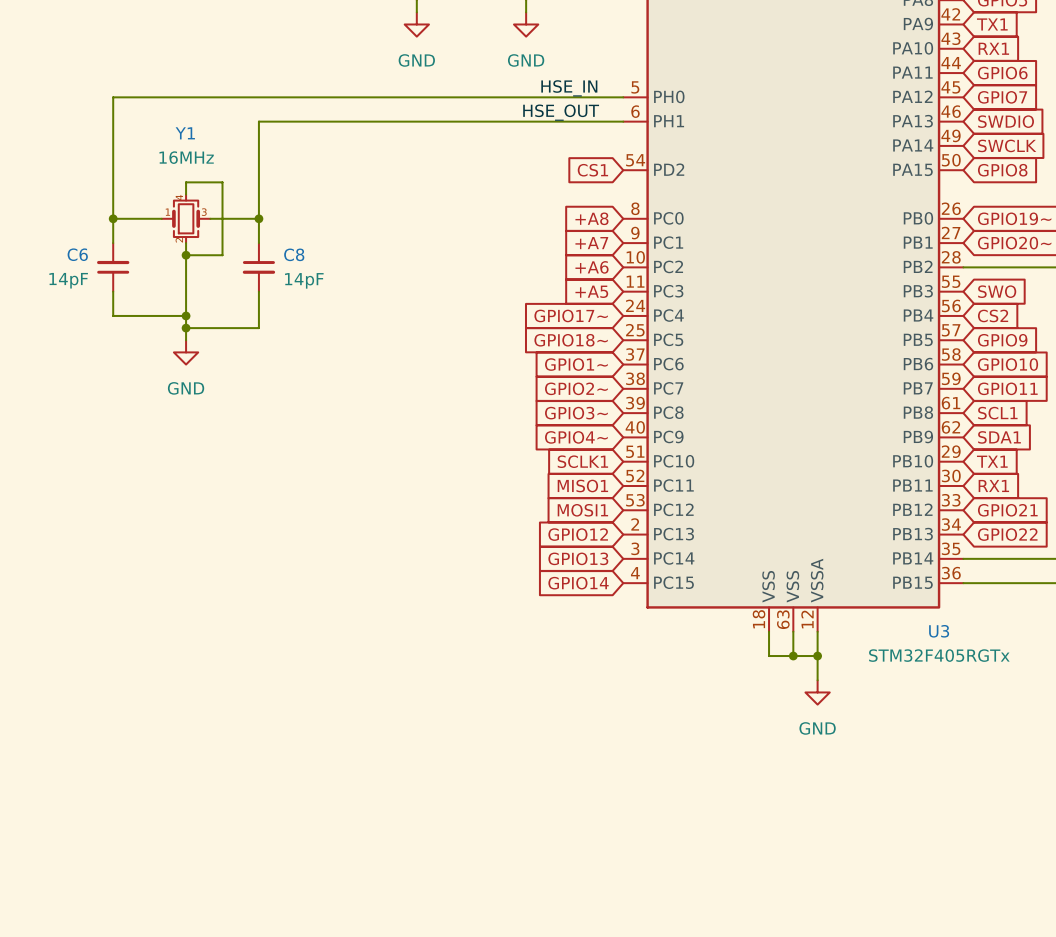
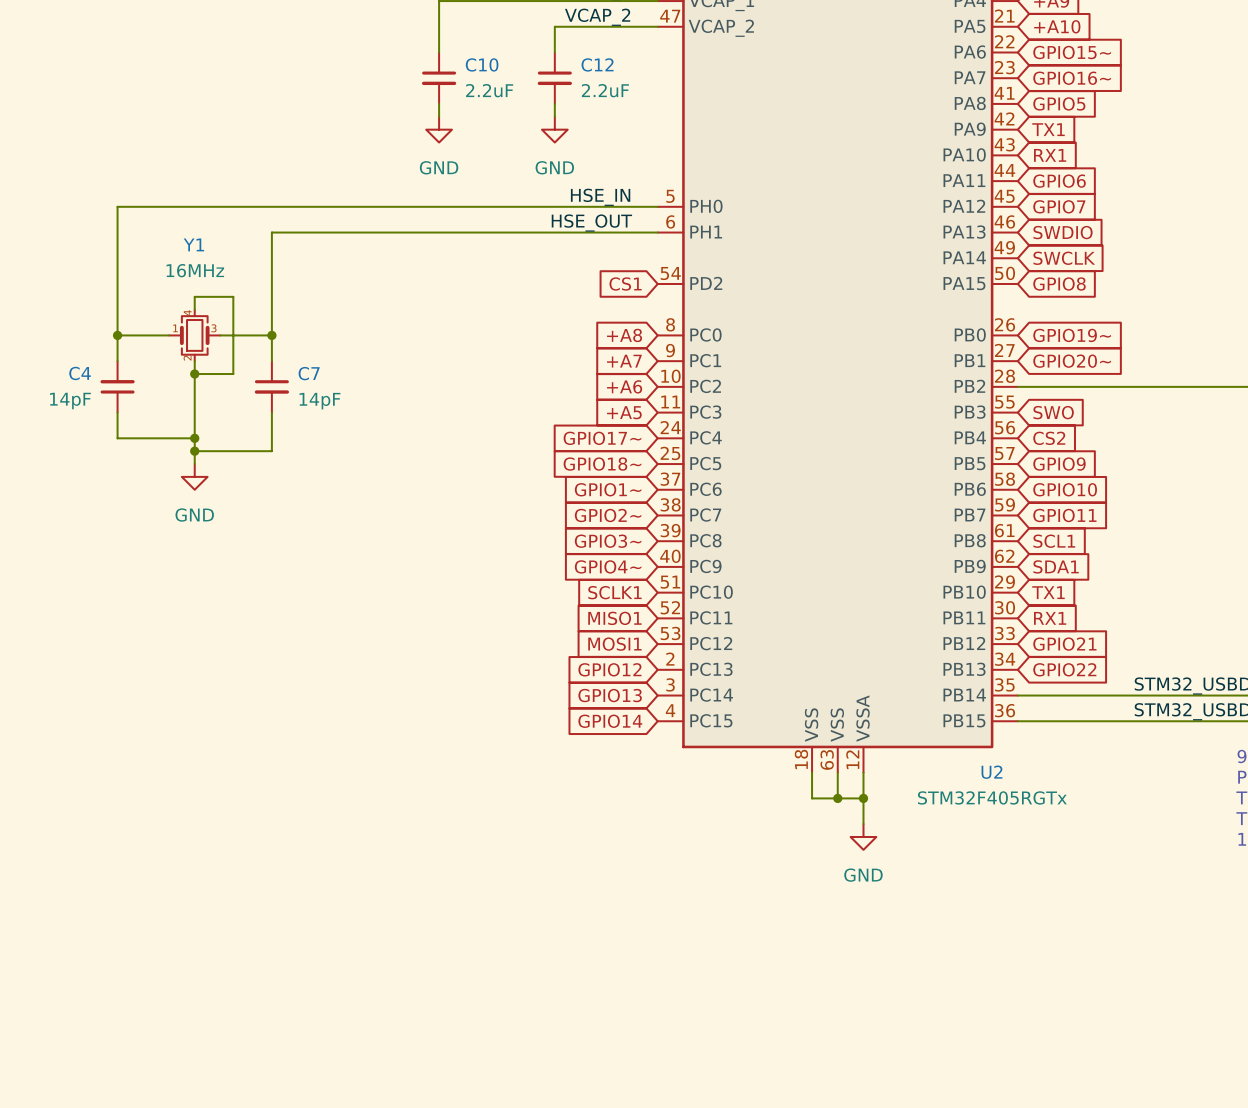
C6 name: C6 (77, 254) -> C4 (80, 373)
C8 name: C8 (294, 254) -> C7 (309, 373)
U3 name: U3 (939, 631) -> U2 (991, 772)

